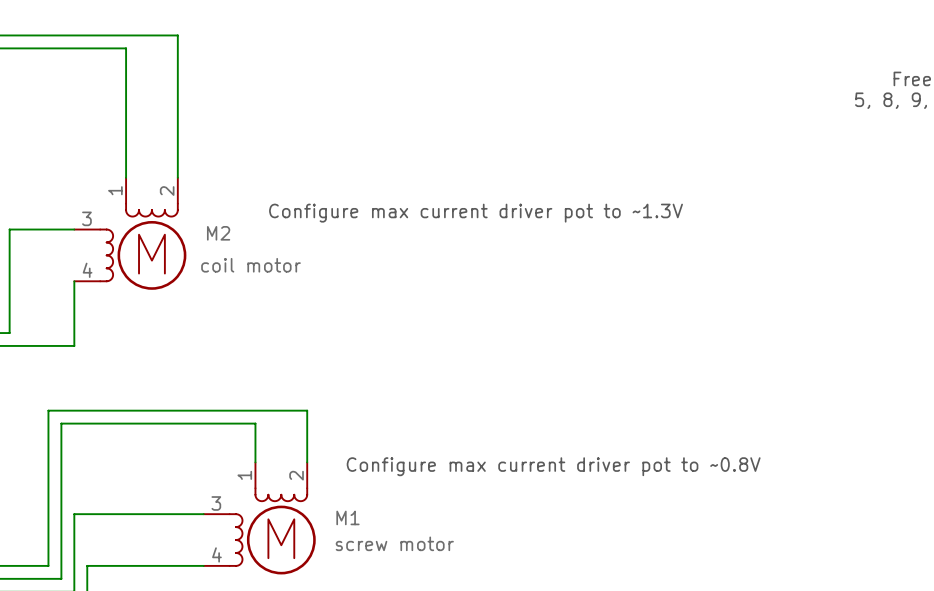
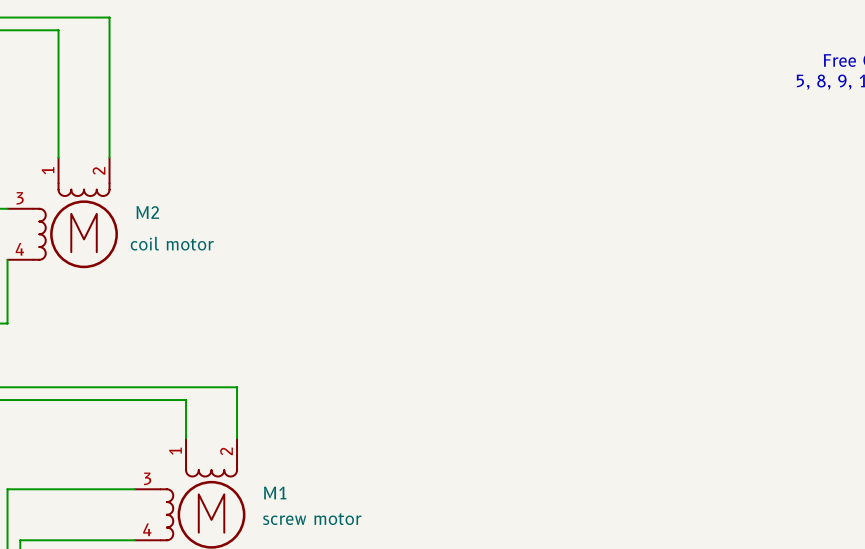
text: Configure max current driver pot to ~1.3V (476, 213) -> none
text: Configure max current driver pot to ~0.8V (553, 466) -> none

